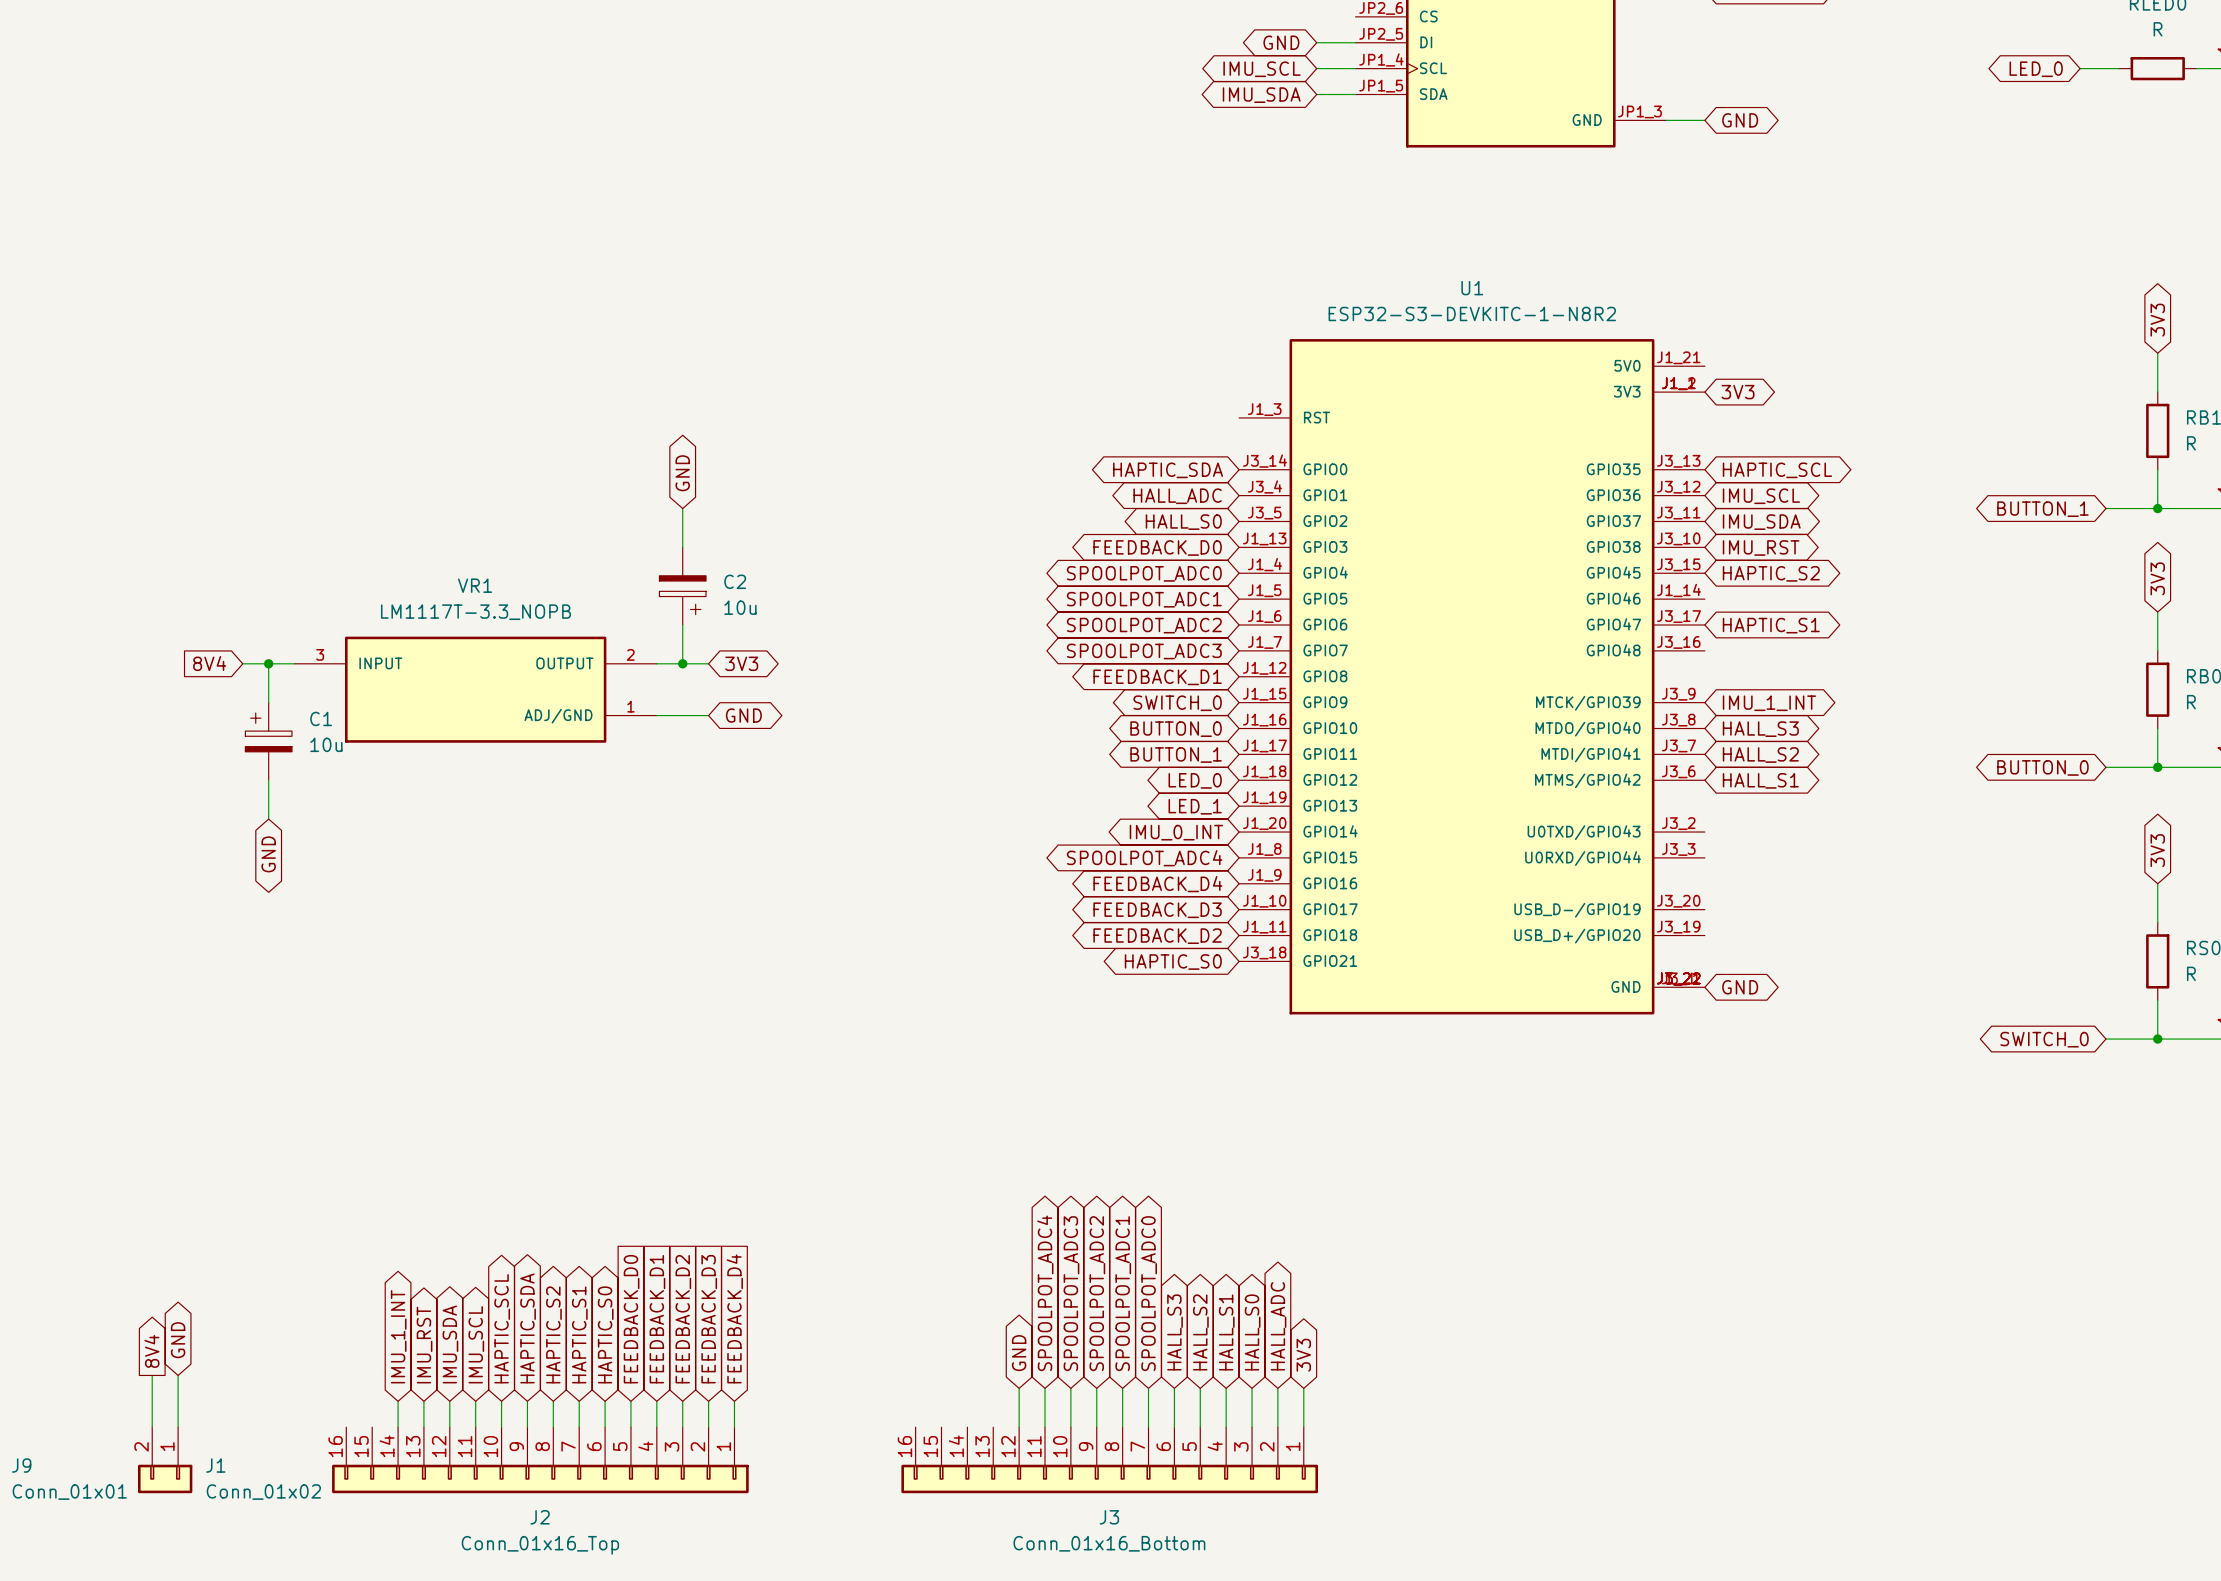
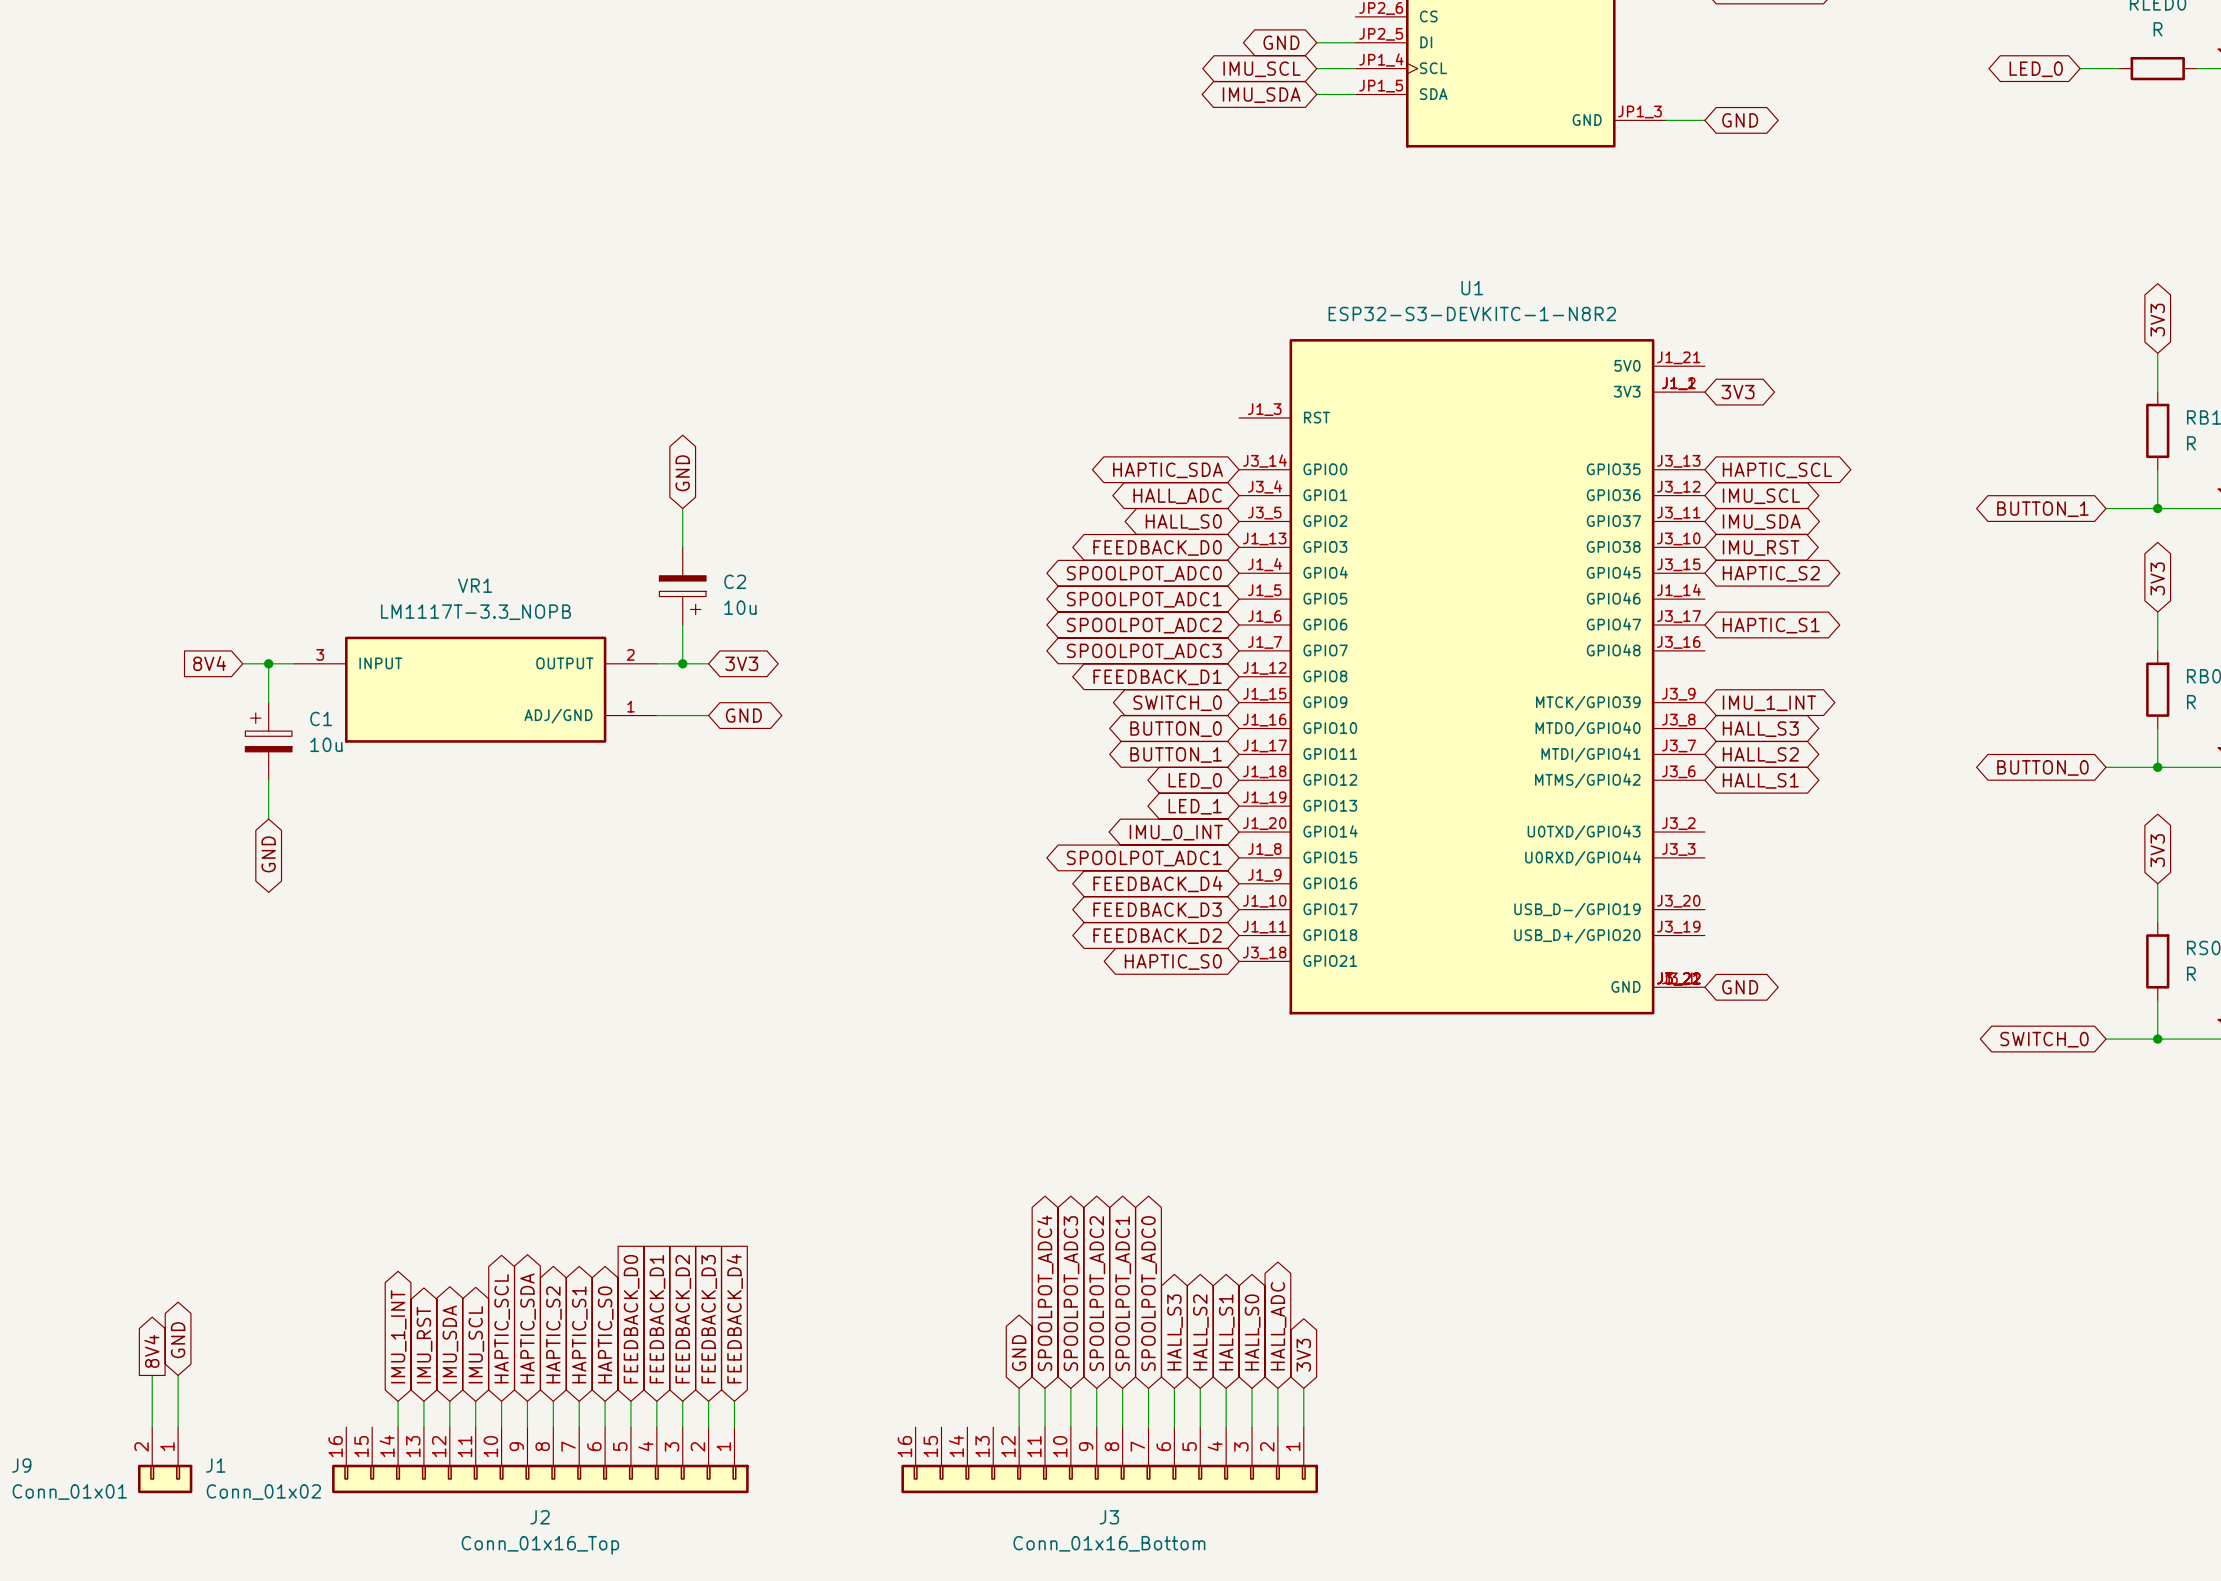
global label: SPOOLPOT_ADC4 (1144, 858) -> SPOOLPOT_ADC1 (1144, 858)

